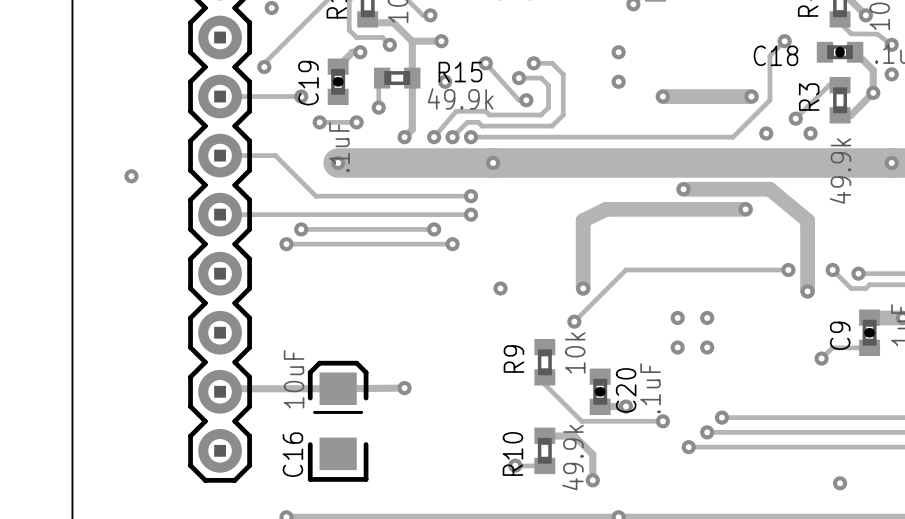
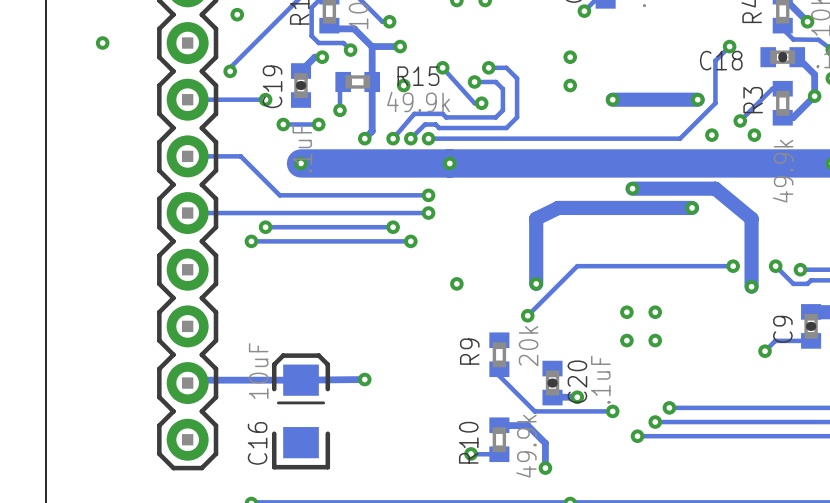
via position: (131, 176) -> (102, 43)
R9 value: 10k (575, 352) -> 20k (528, 346)
via: (840, 483) -> none

